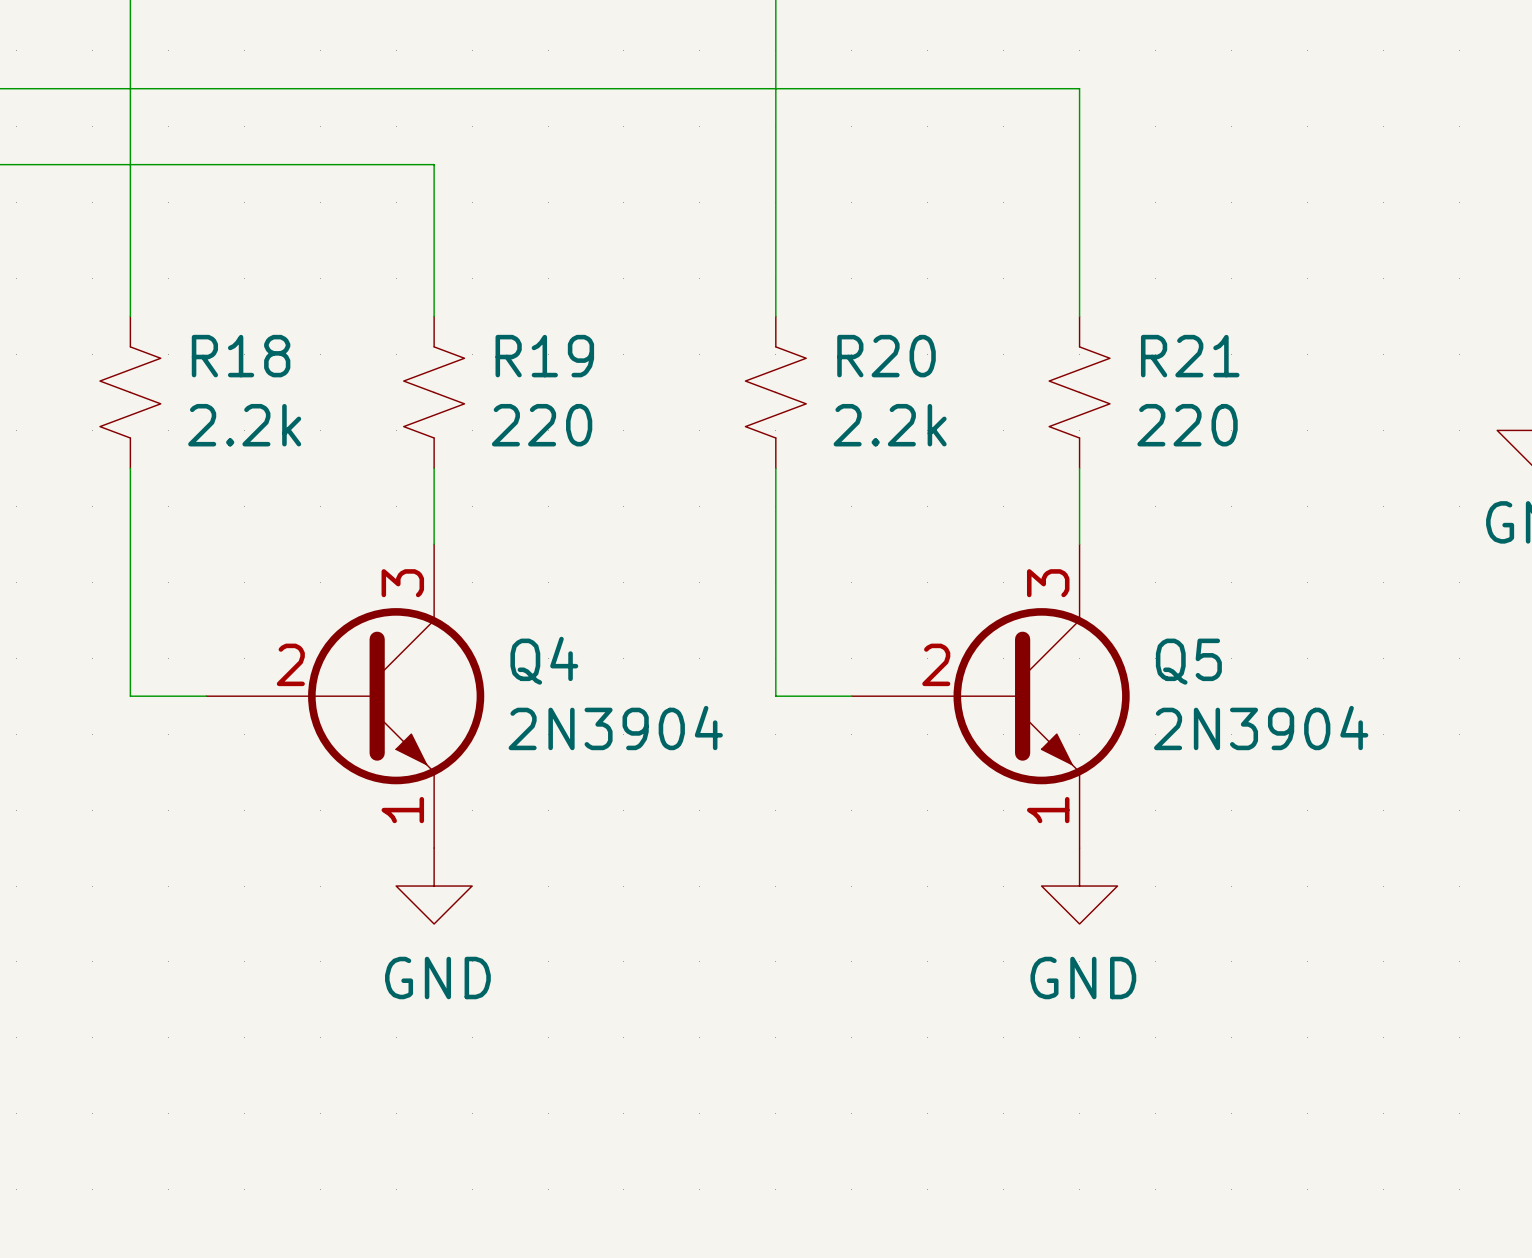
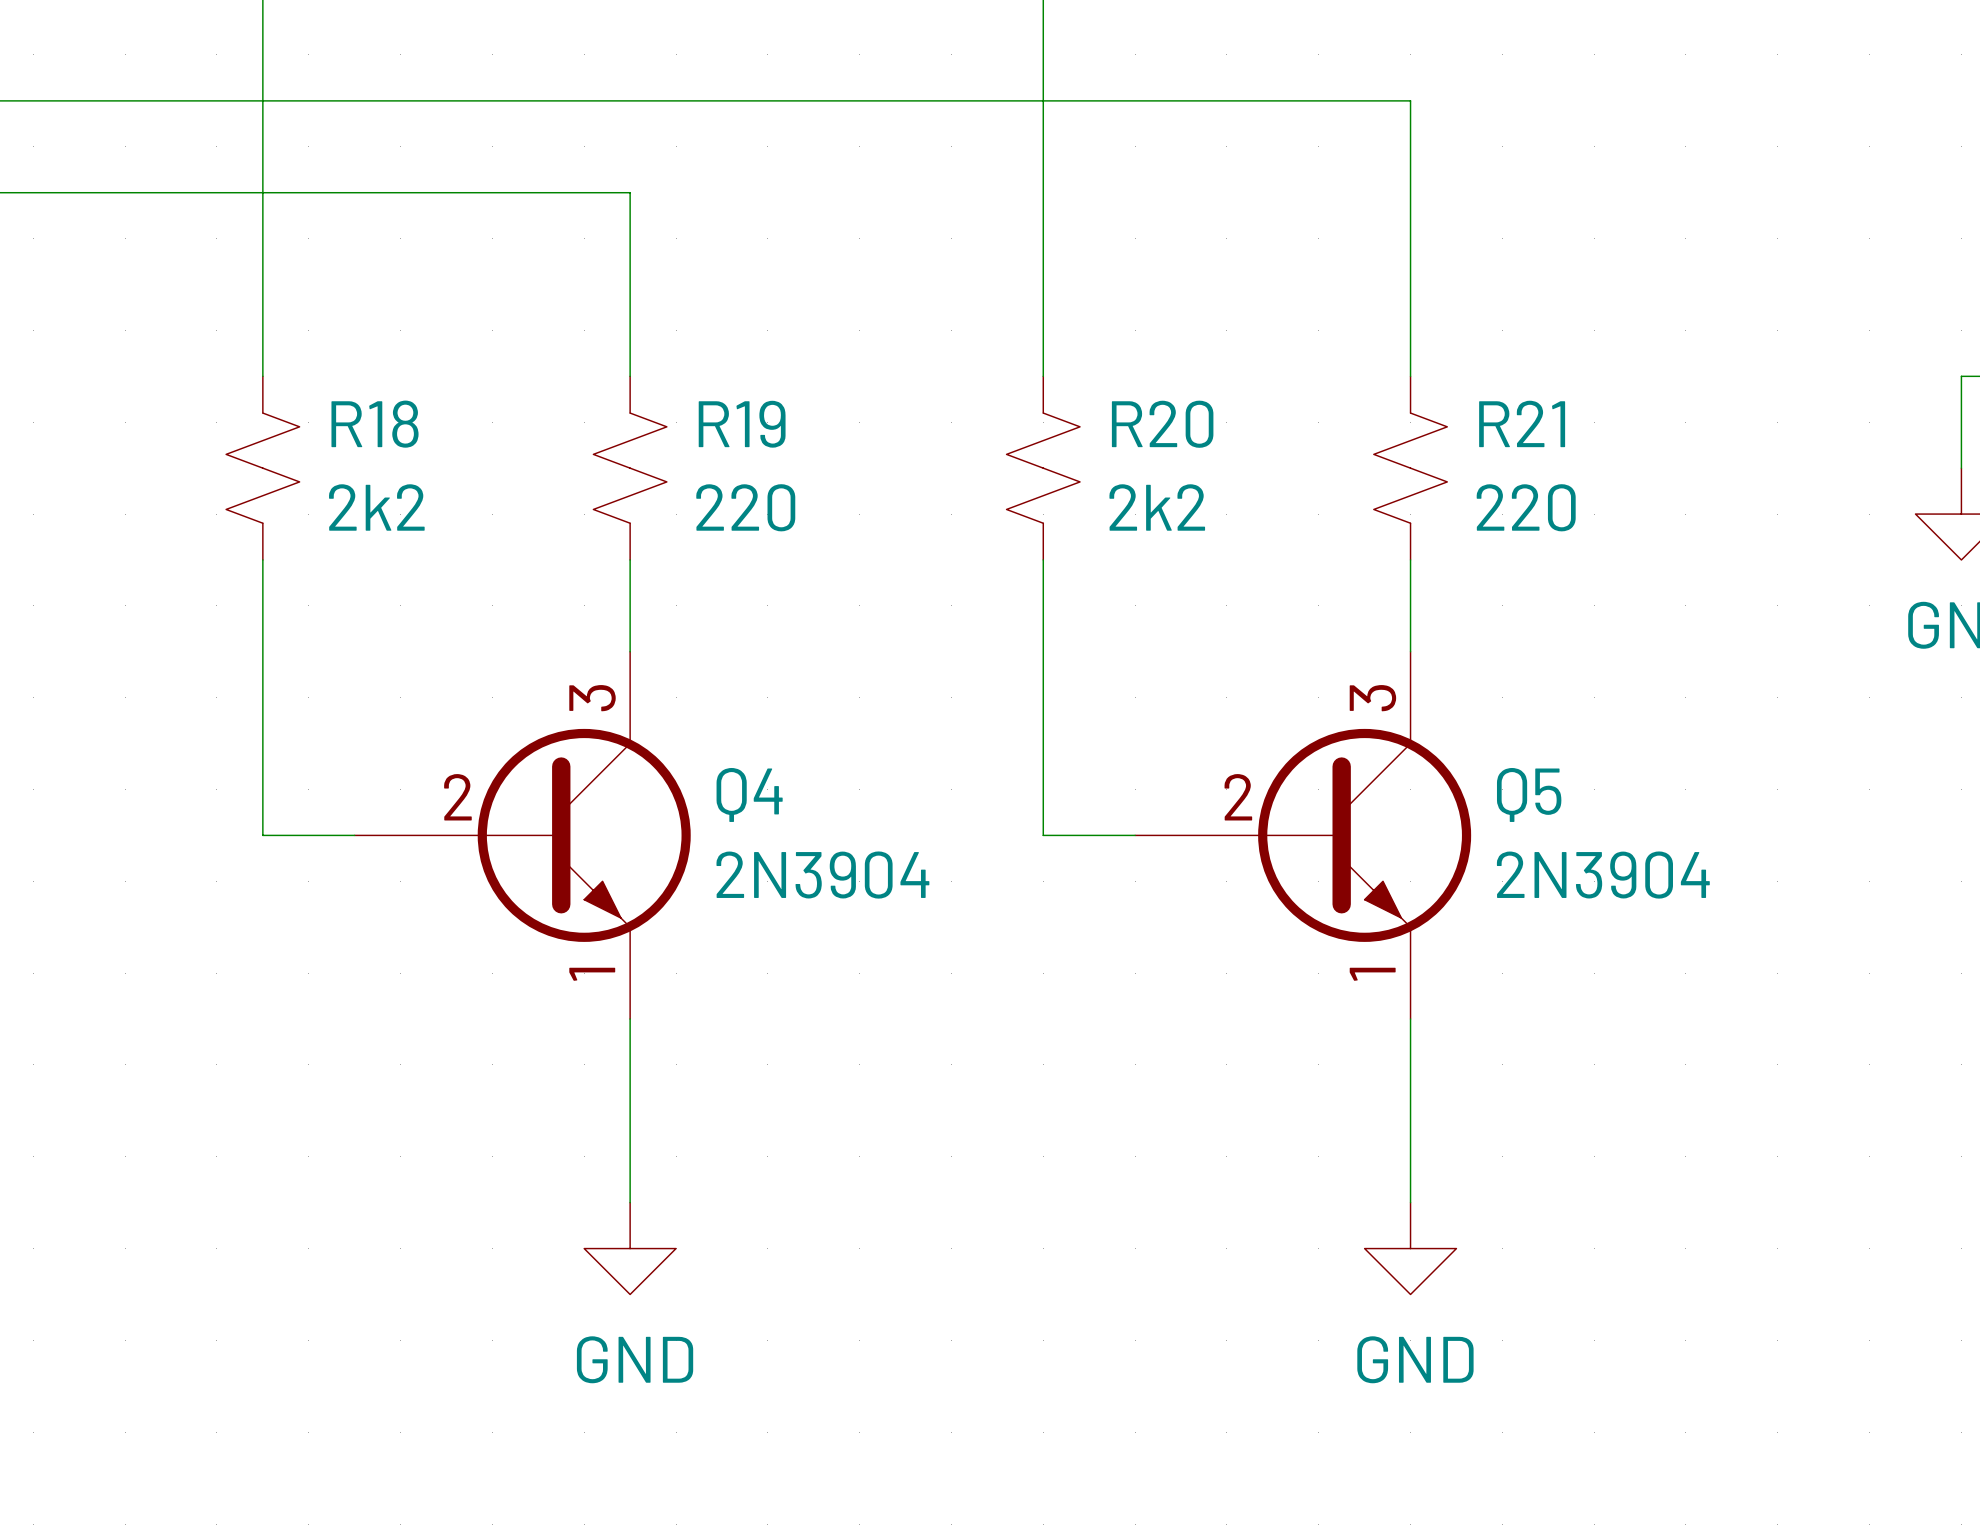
R18 value: 2.2k (244, 425) -> 2k2 (376, 507)
R20 value: 2.2k (890, 425) -> 2k2 (1157, 507)
wire: none -> (630, 1019) (630, 1202)
wire: none -> (1410, 1019) (1410, 1202)
power symbol position: GND (434, 886) -> GND (630, 1248)
power symbol position: GND (1079, 886) -> GND (1410, 1248)

